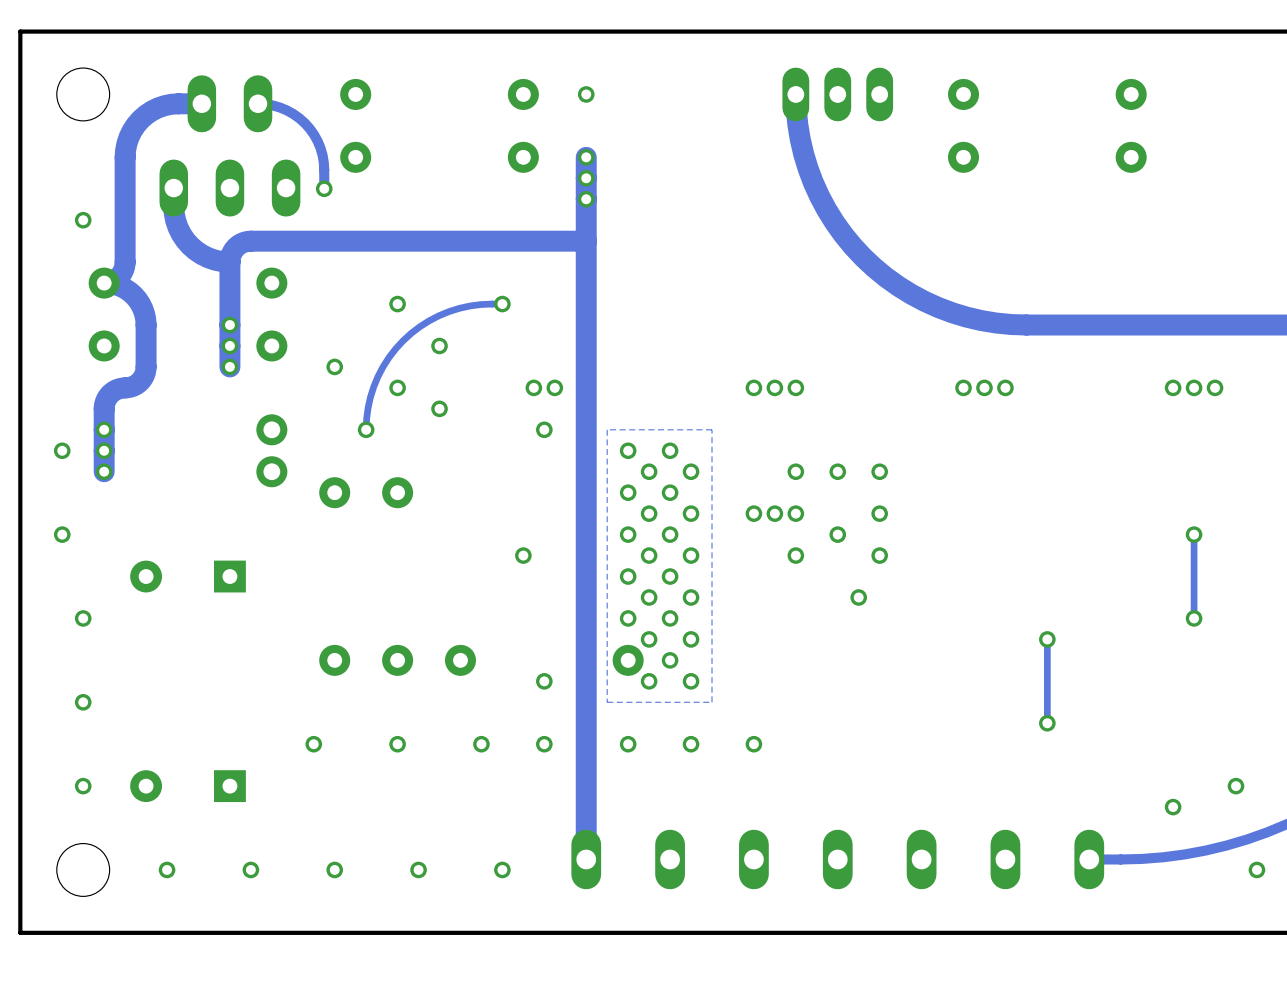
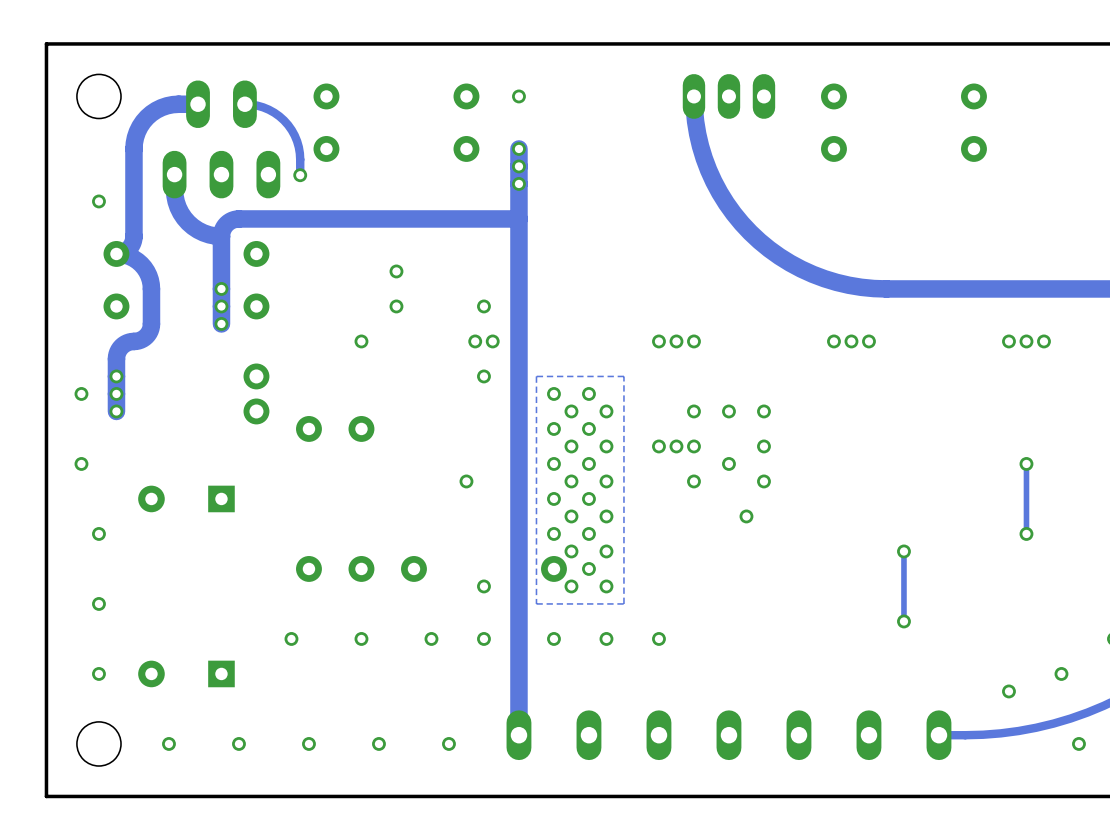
via: (397, 304) -> none
via: none -> (396, 271)
track: (502, 304) (470, 305) (448, 311) (419, 326) (403, 340) (383, 366) (373, 386) (368, 407) (366, 429) -> none
via: (502, 304) -> none
via: none -> (483, 306)
via: (334, 366) -> none
via: (439, 408) -> none
via: (366, 429) -> none

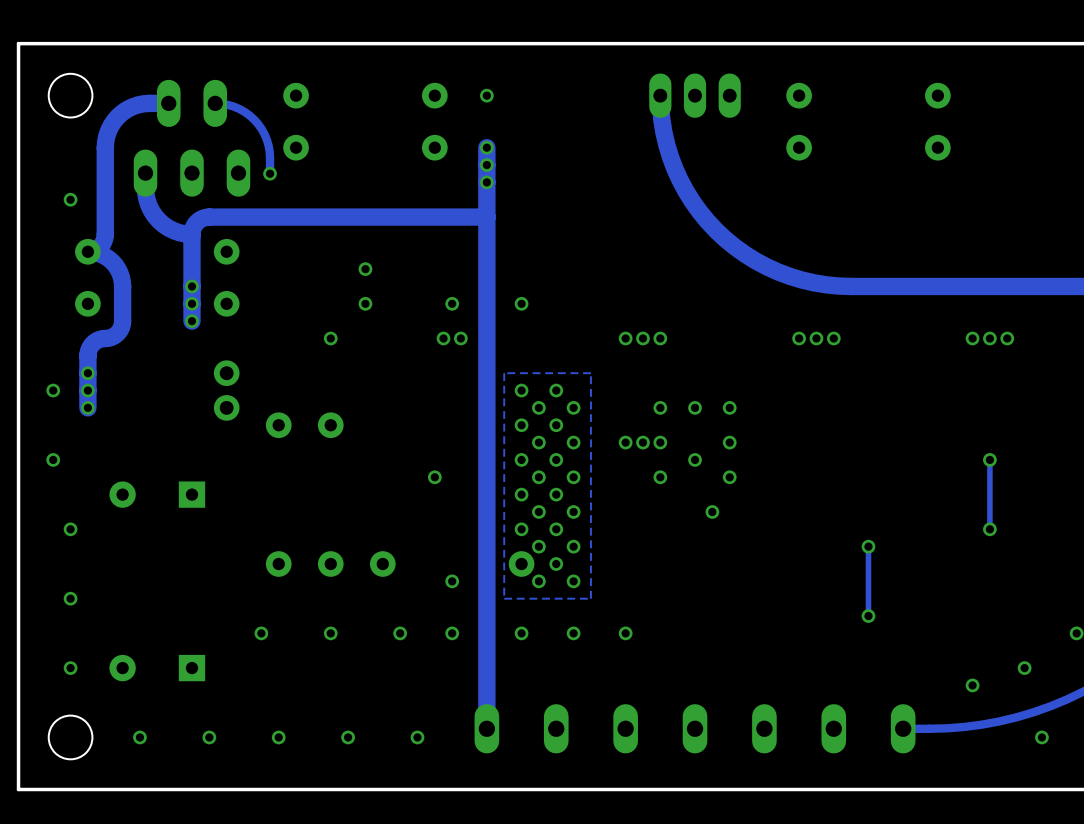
via: none -> (521, 303)
via: (483, 376) -> none

